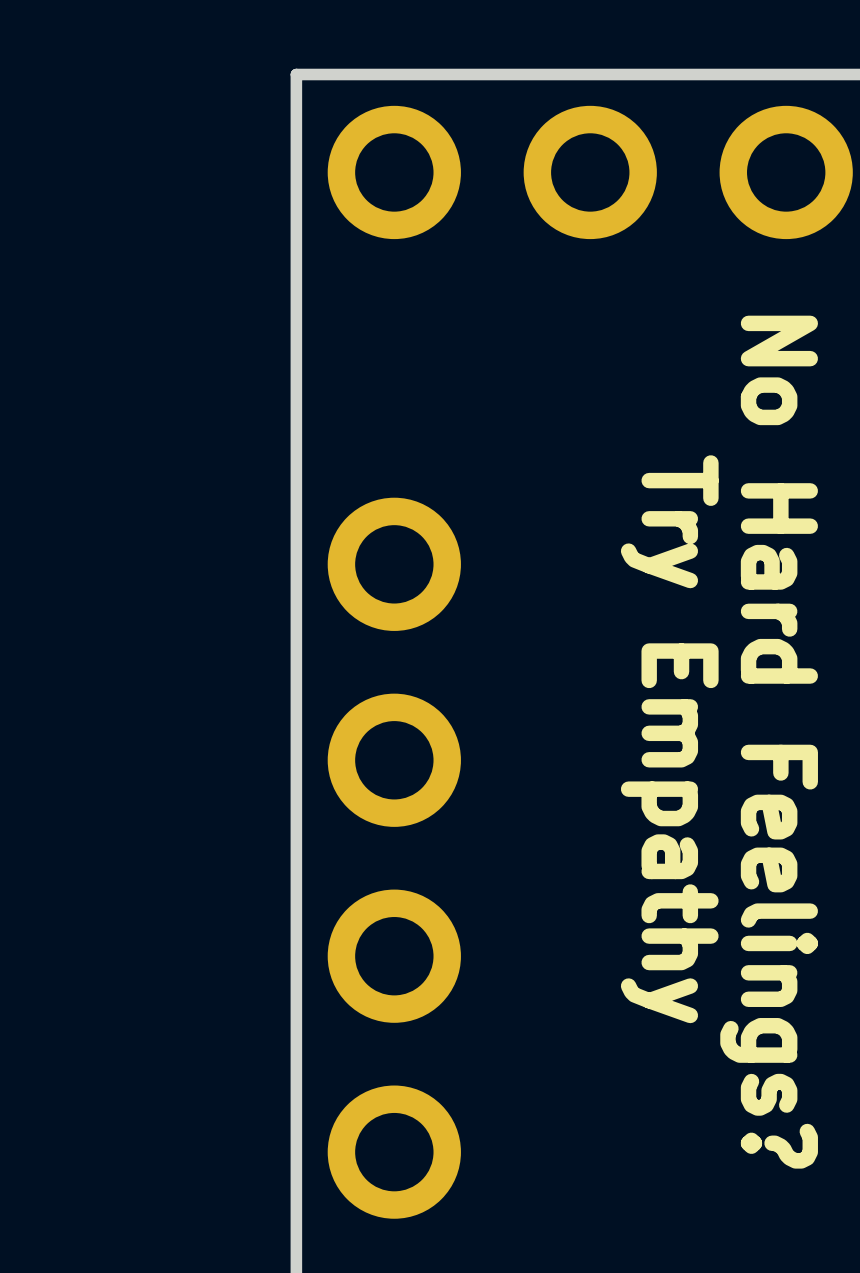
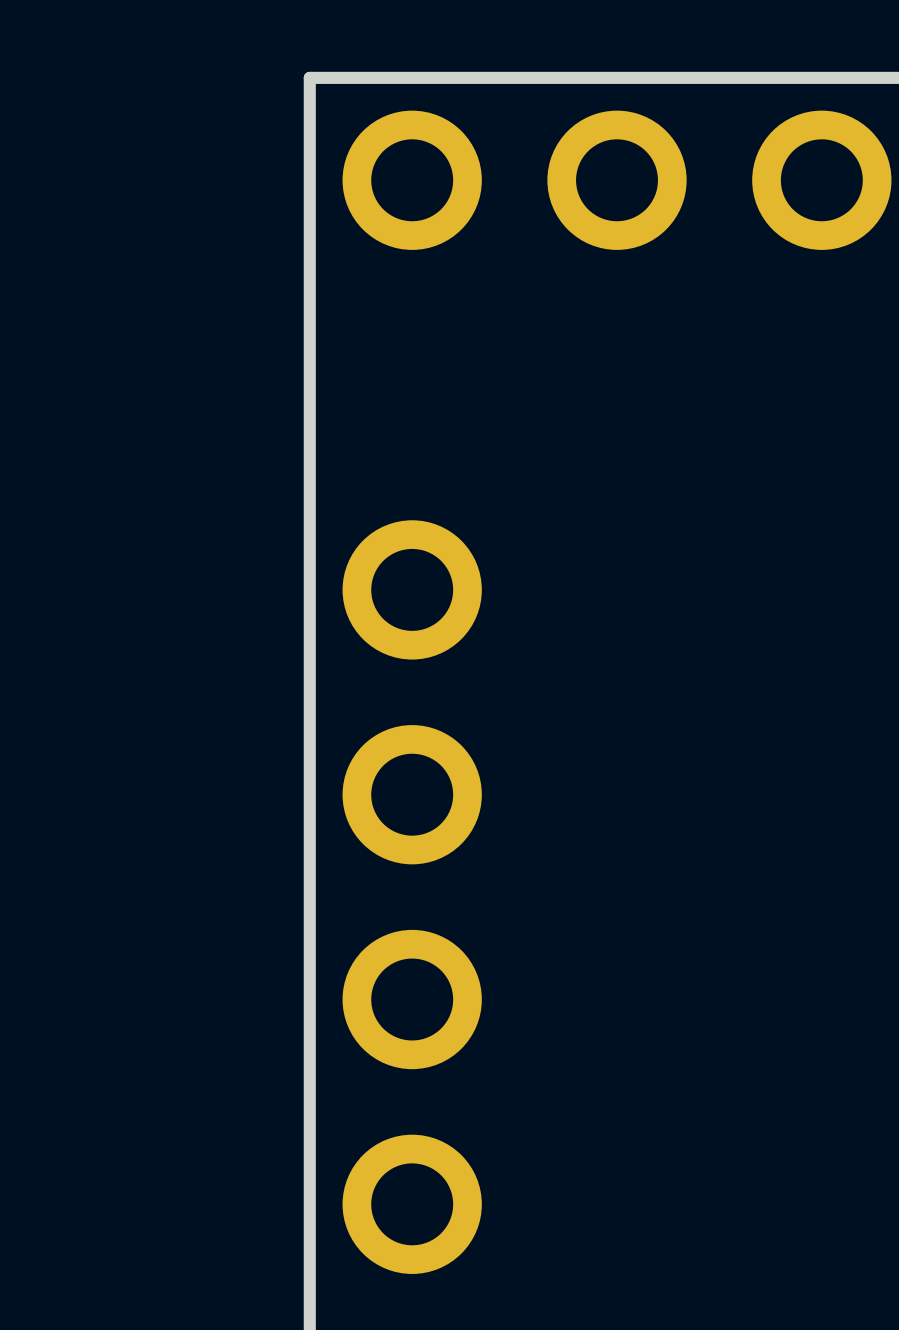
text: Try Empathy (669, 739) -> none
text: No Hard Feelings? (769, 742) -> none

